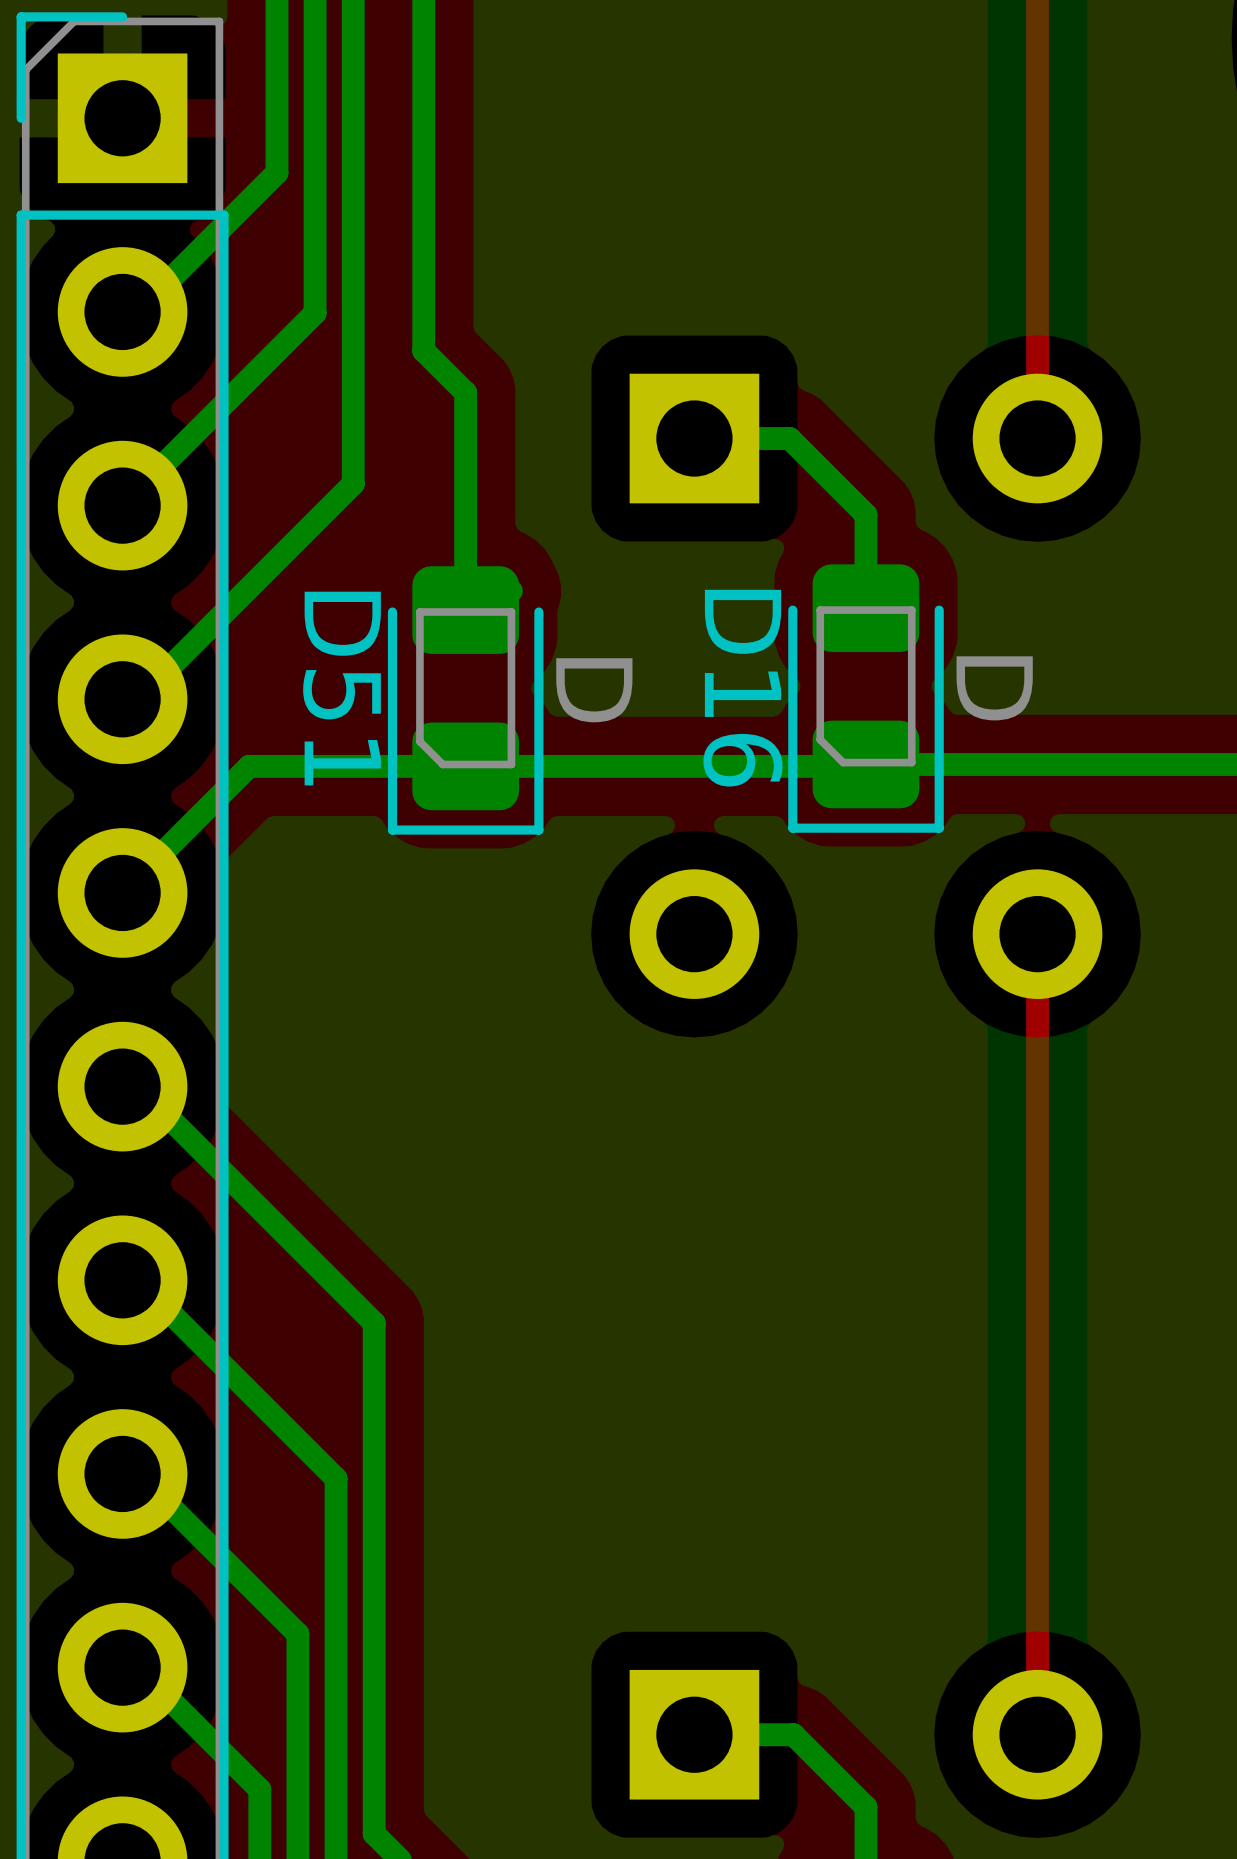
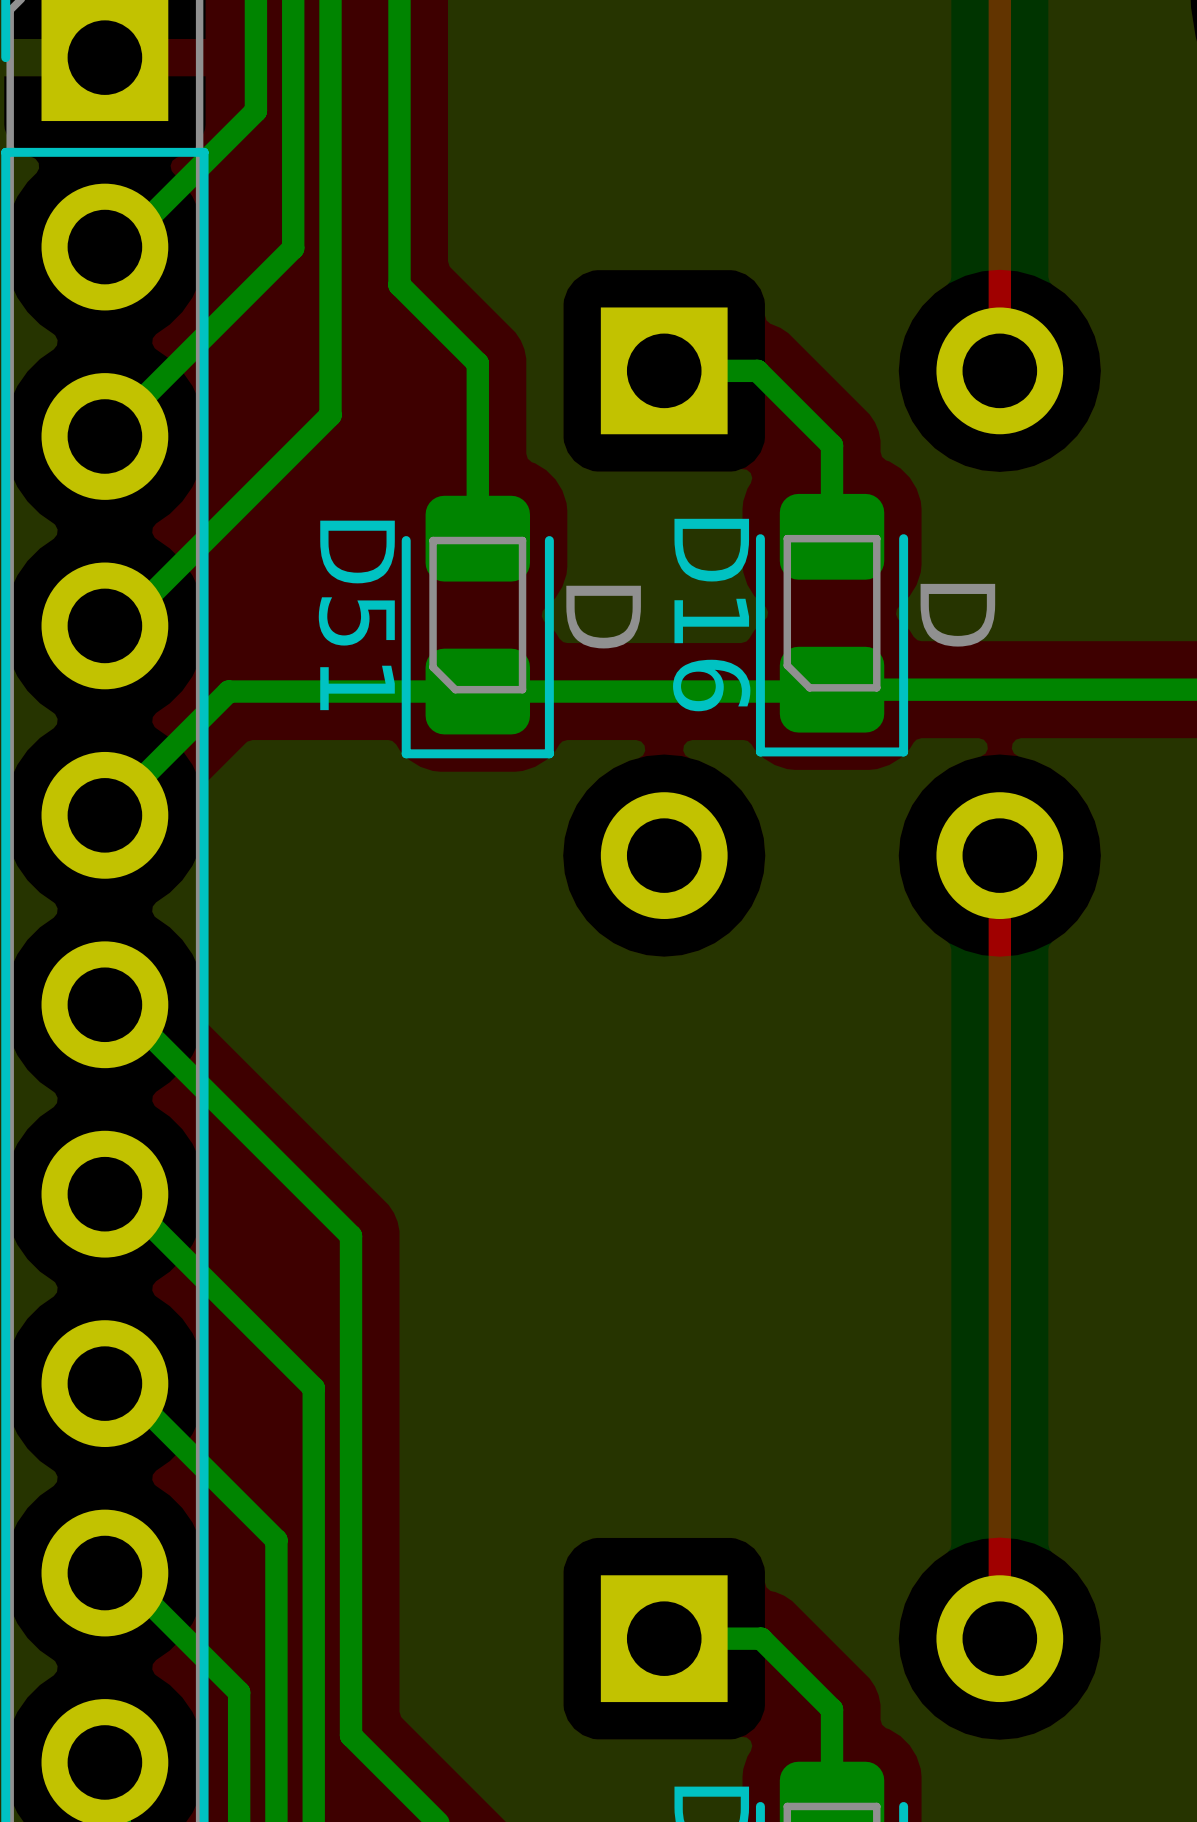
bottom track: (465, 392) (465, 610) -> (440, 326) (477, 363) (477, 520)
D51 position: (465, 700) -> (477, 627)

